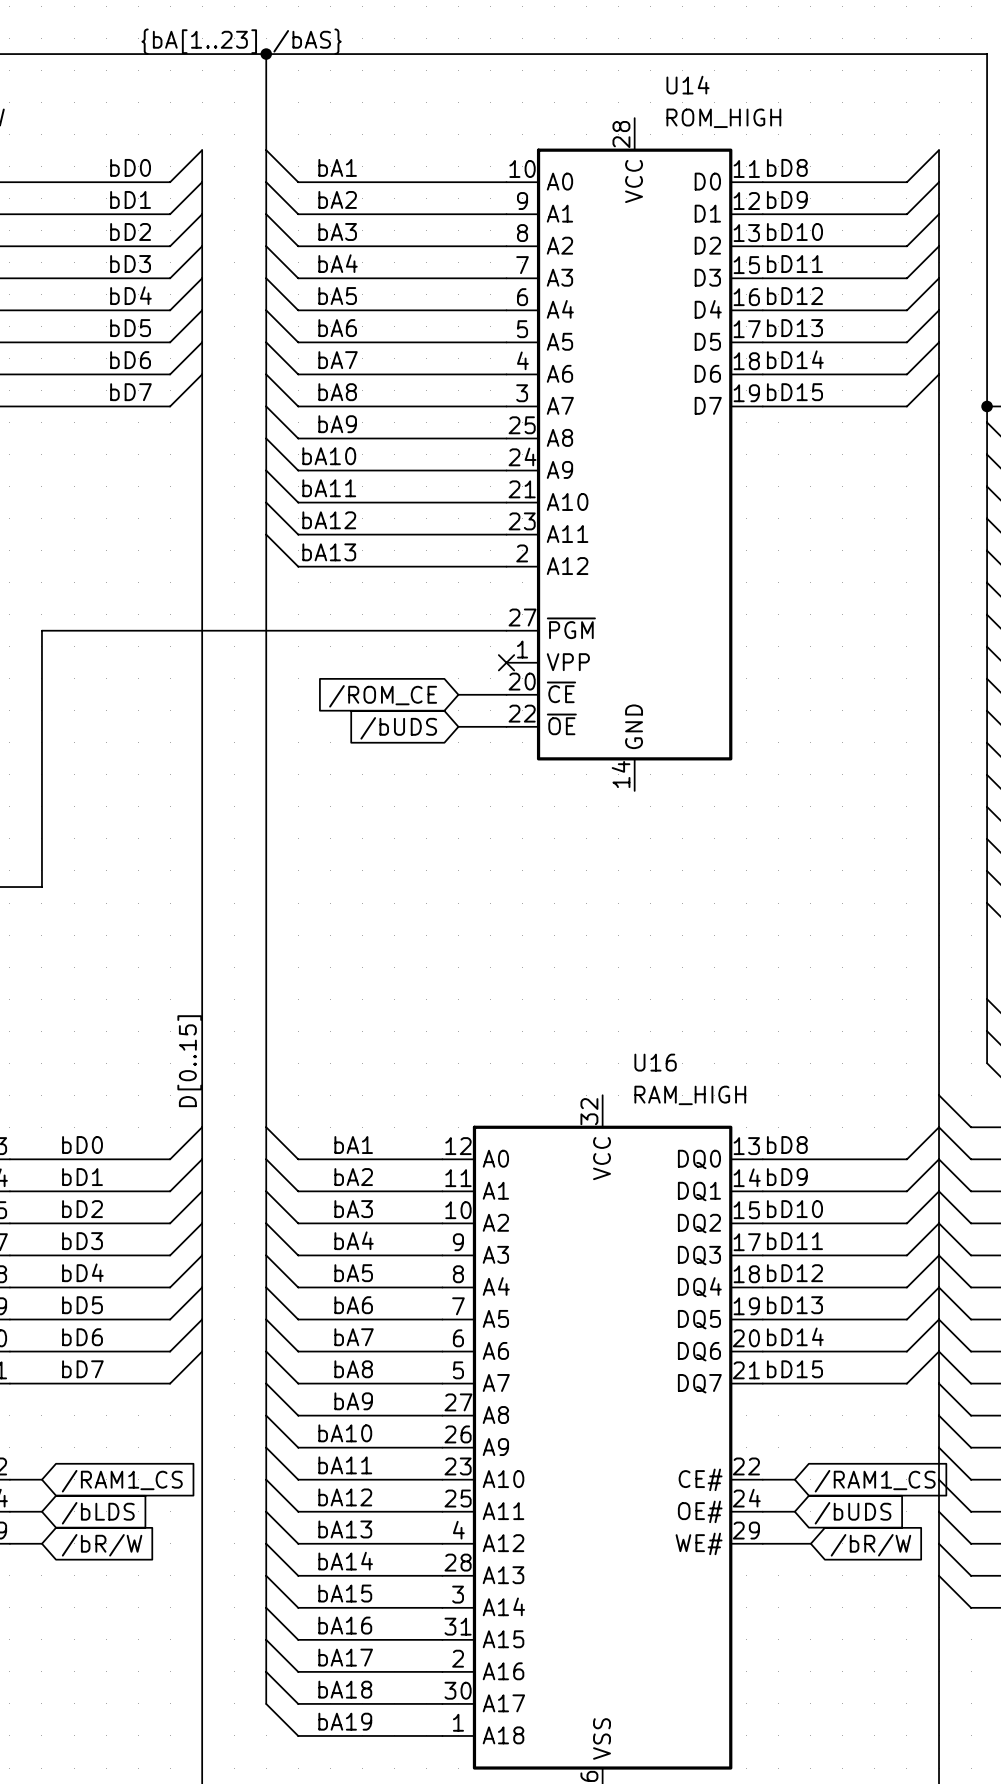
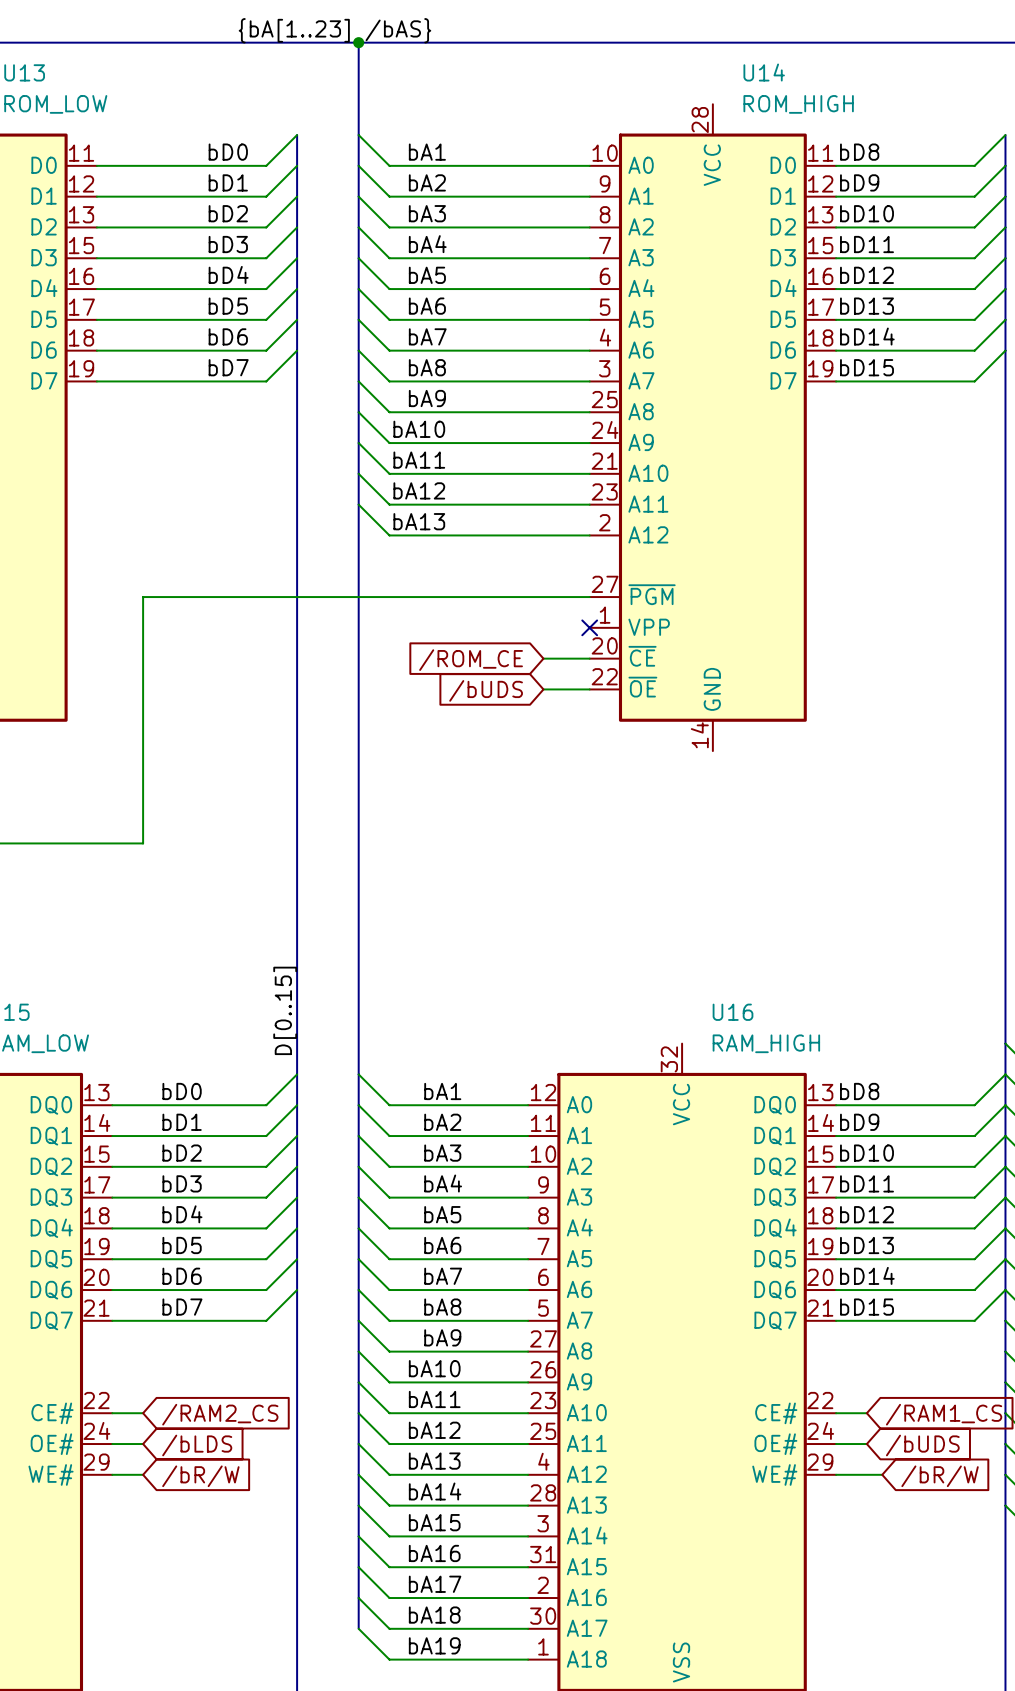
global label: /RAM1_CS (122, 1481) -> /RAM2_CS (220, 1414)

